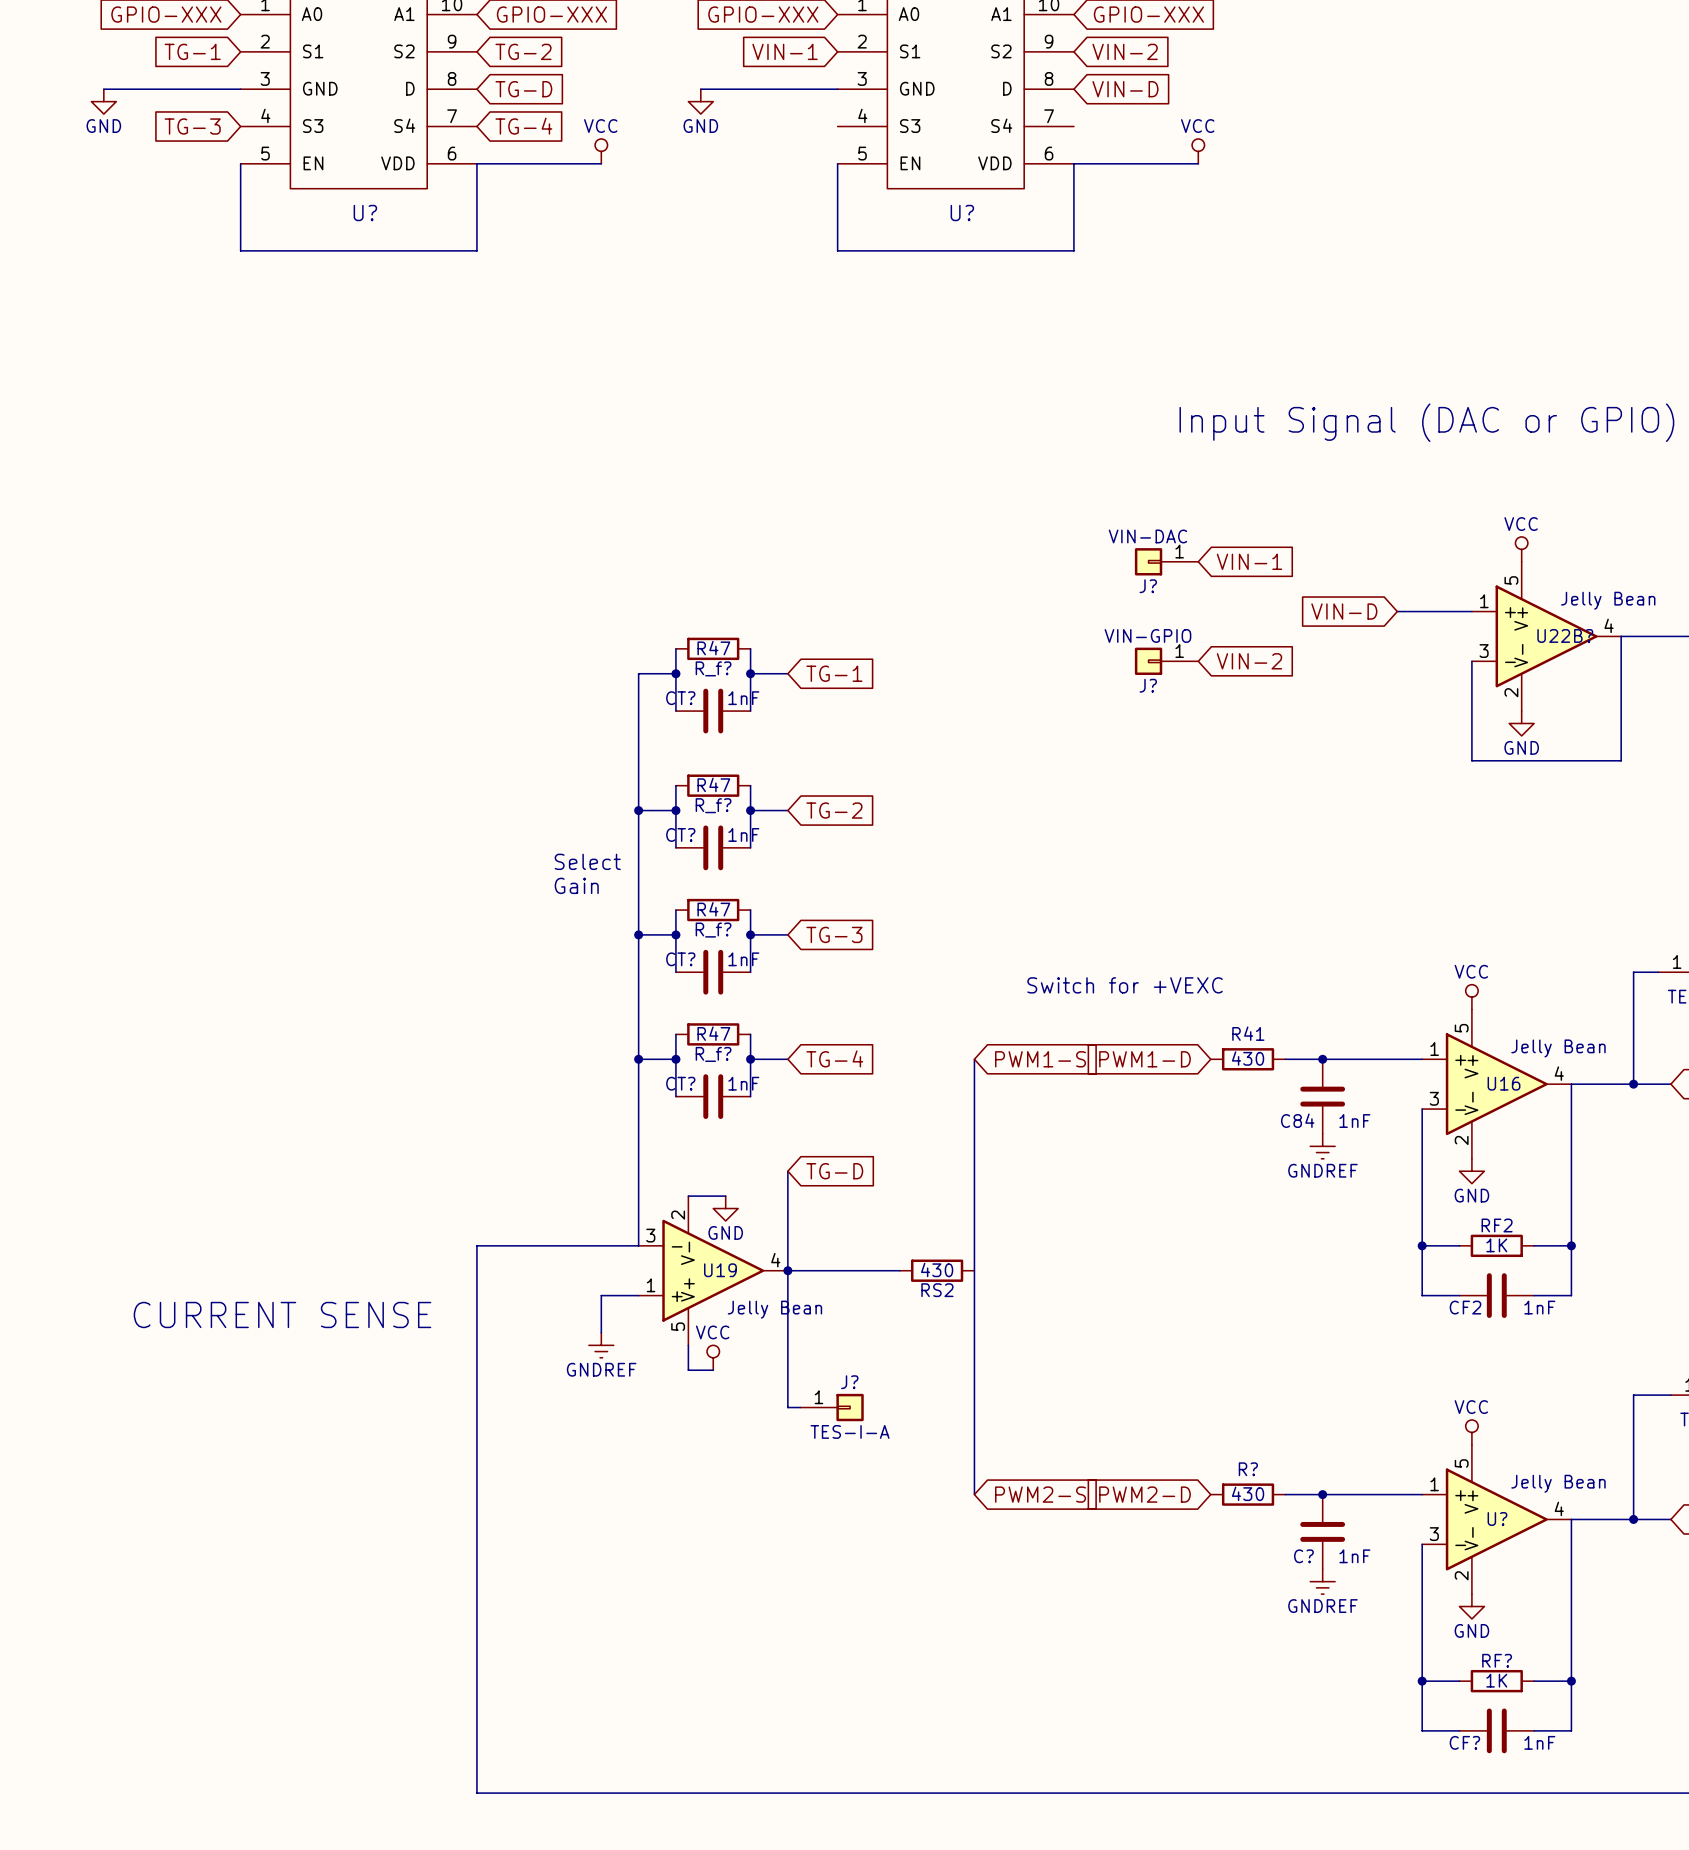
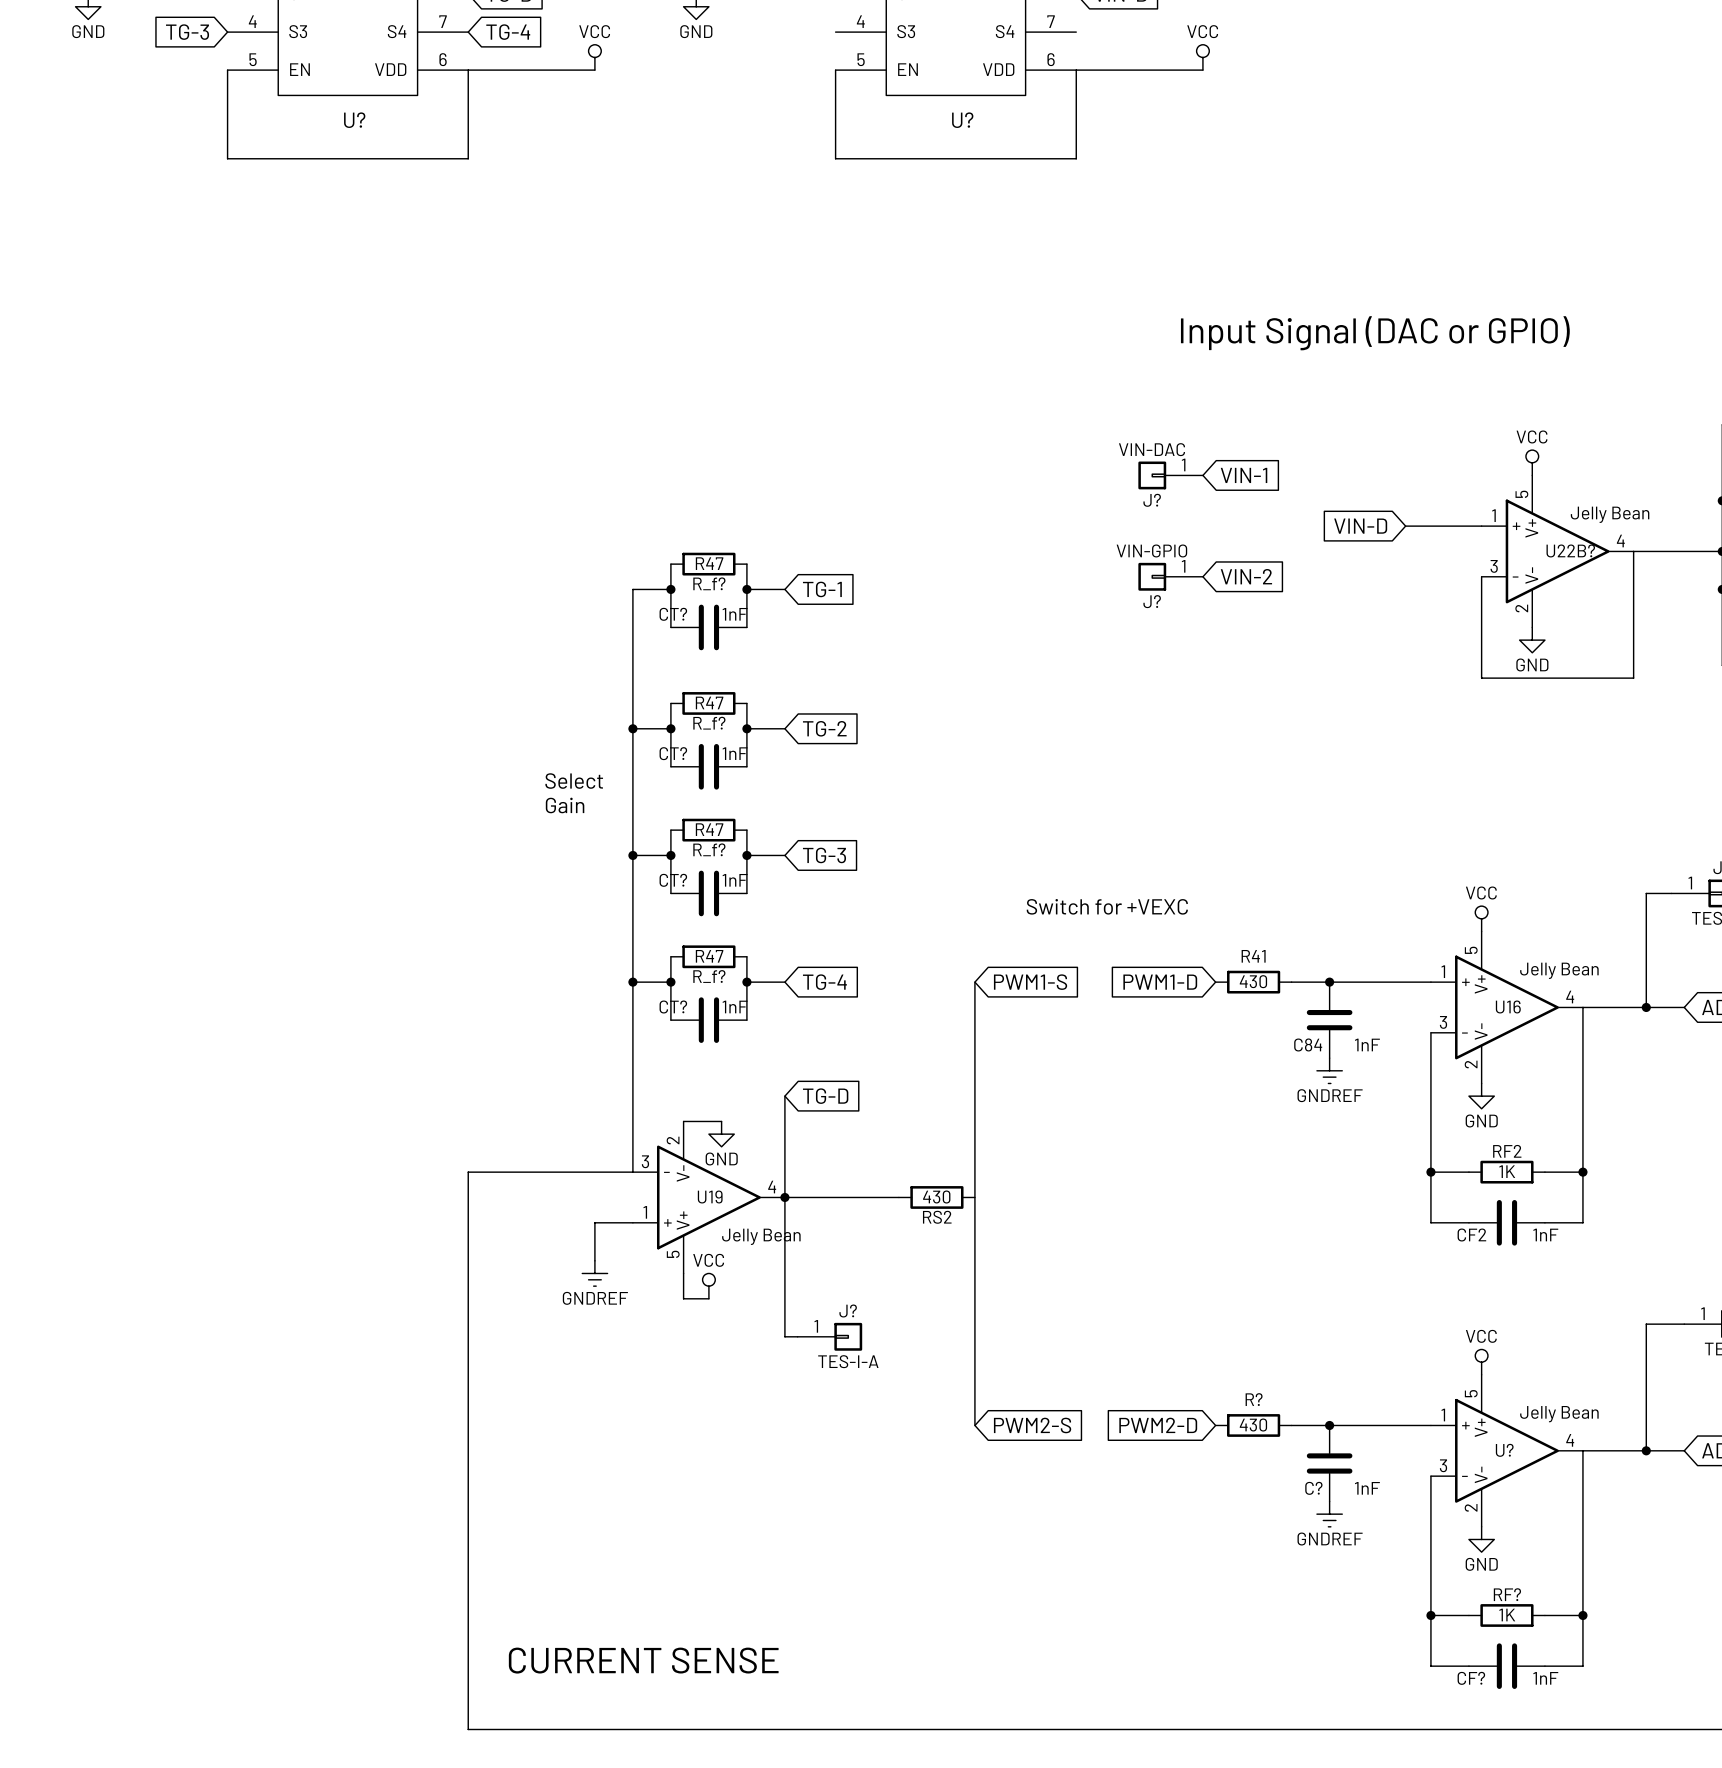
text: CURRENT SENSE (282, 1314) -> none
text: none -> CURRENT SENSE (643, 1660)

